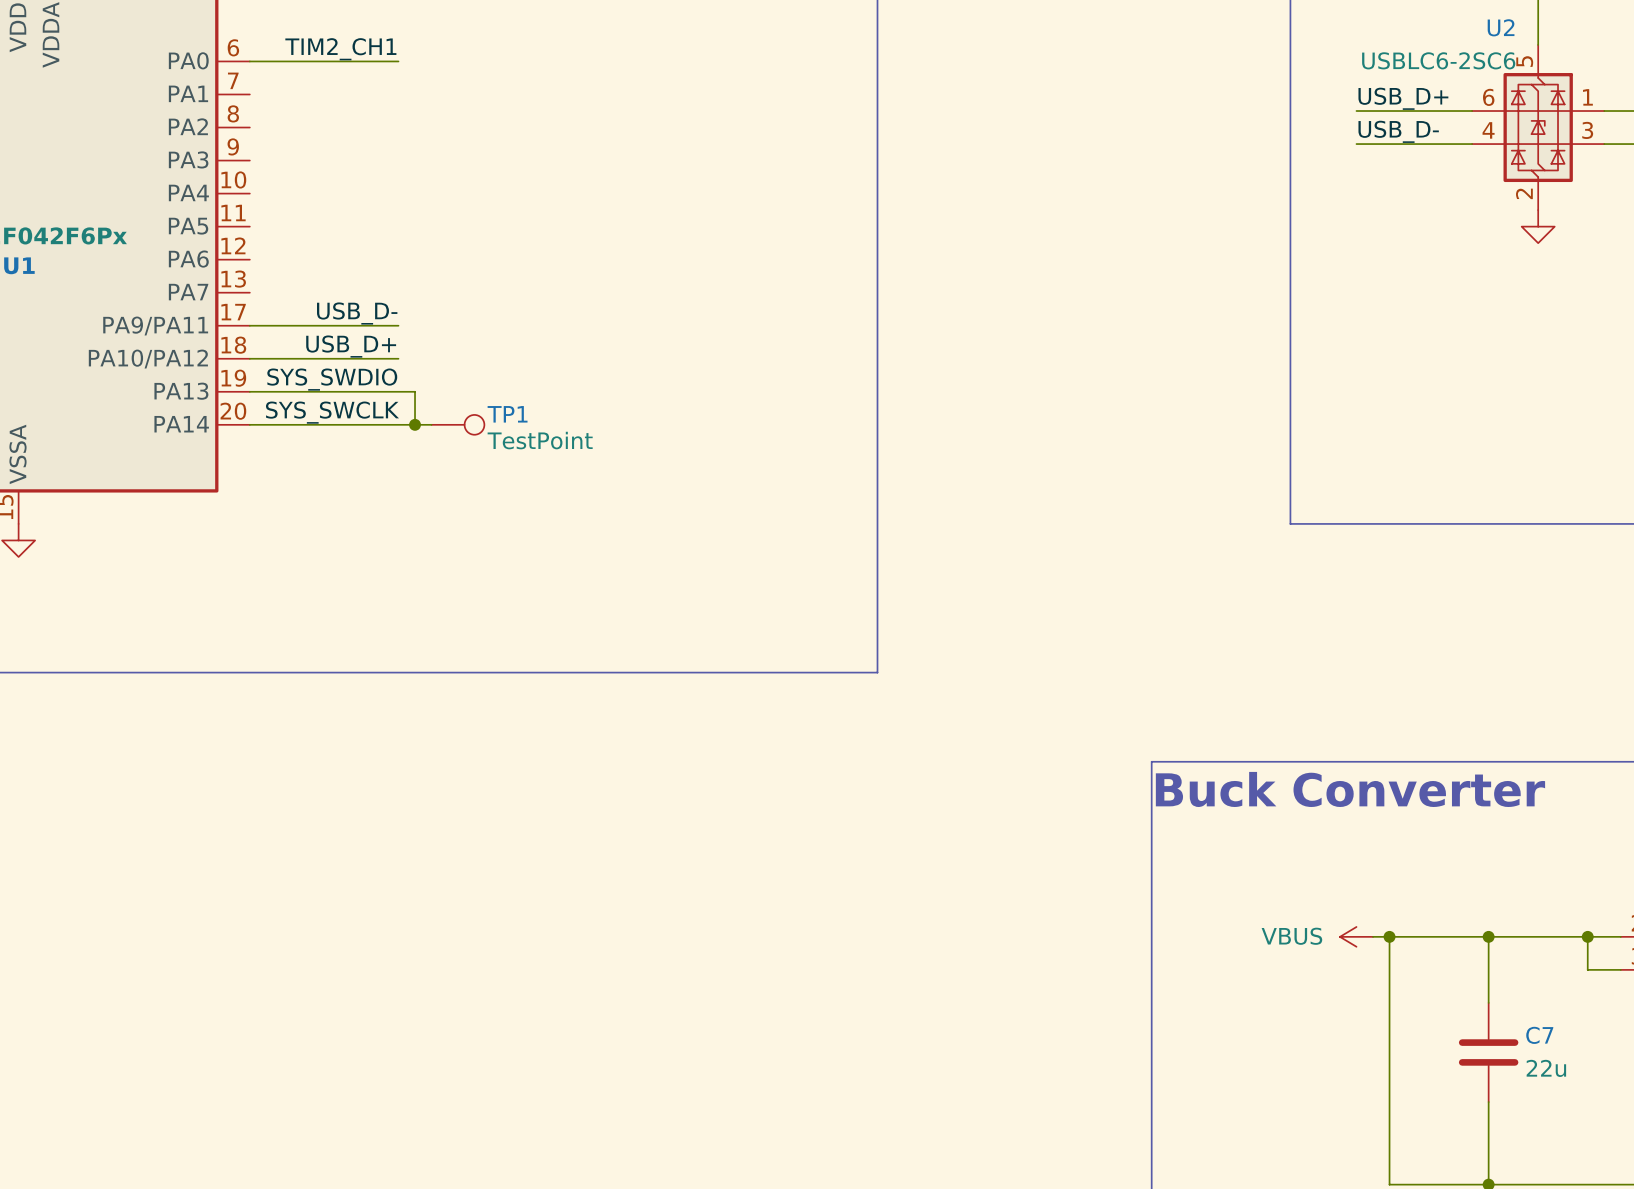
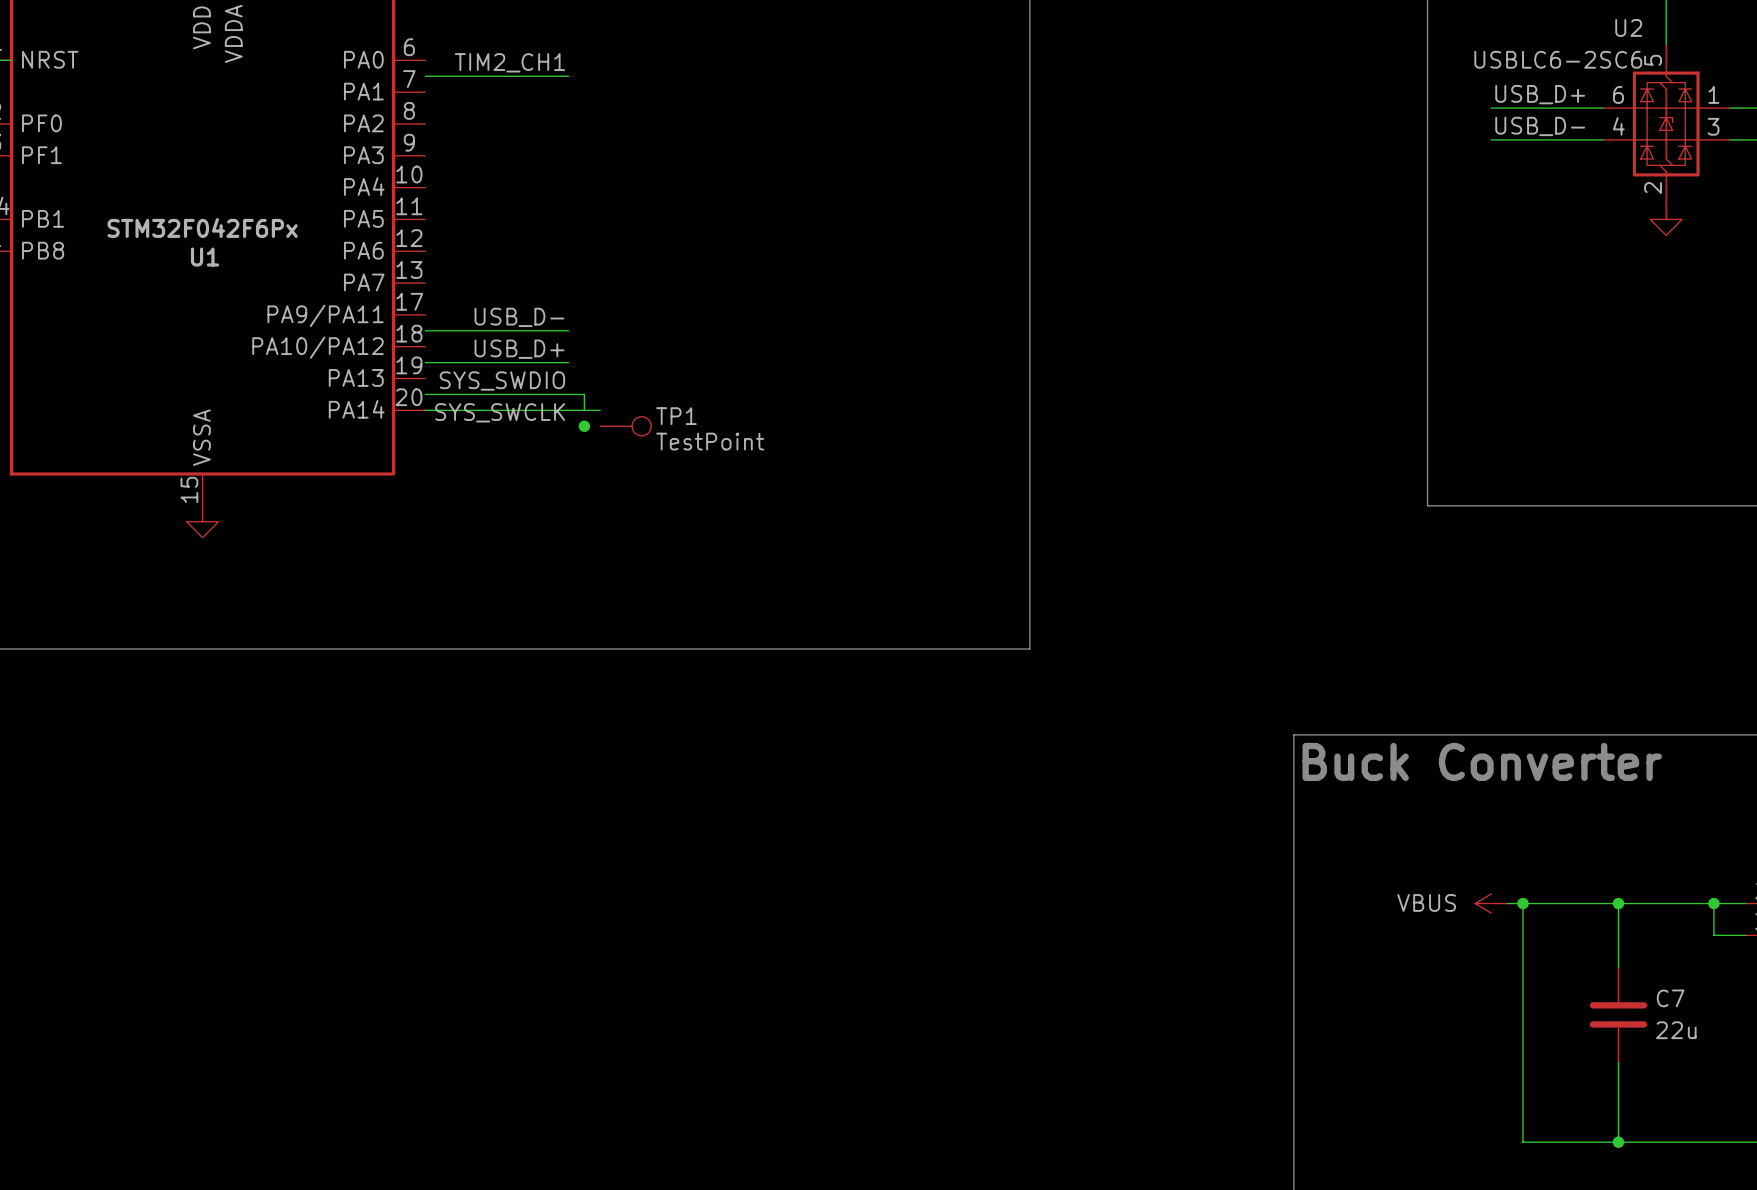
label position: TIM2_CH1 (340, 49) -> TIM2_CH1 (509, 62)
wire: (249, 61) (398, 61) -> (425, 76) (568, 76)
label position: USB_D- (357, 313) -> USB_D- (519, 317)
wire: (249, 325) (398, 325) -> (425, 330) (568, 330)
label position: USB_D+ (351, 346) -> USB_D+ (519, 349)
wire: (249, 358) (398, 358) -> (425, 362) (568, 362)
label position: SYS_SWDIO (332, 379) -> SYS_SWDIO (502, 381)
wire: (249, 391) (415, 391) (415, 408) -> (425, 394) (584, 394)
label position: SYS_SWCLK (332, 412) -> SYS_SWCLK (500, 412)
junction position: (415, 424) -> (584, 426)
TP1 position: (457, 424) -> (625, 426)

